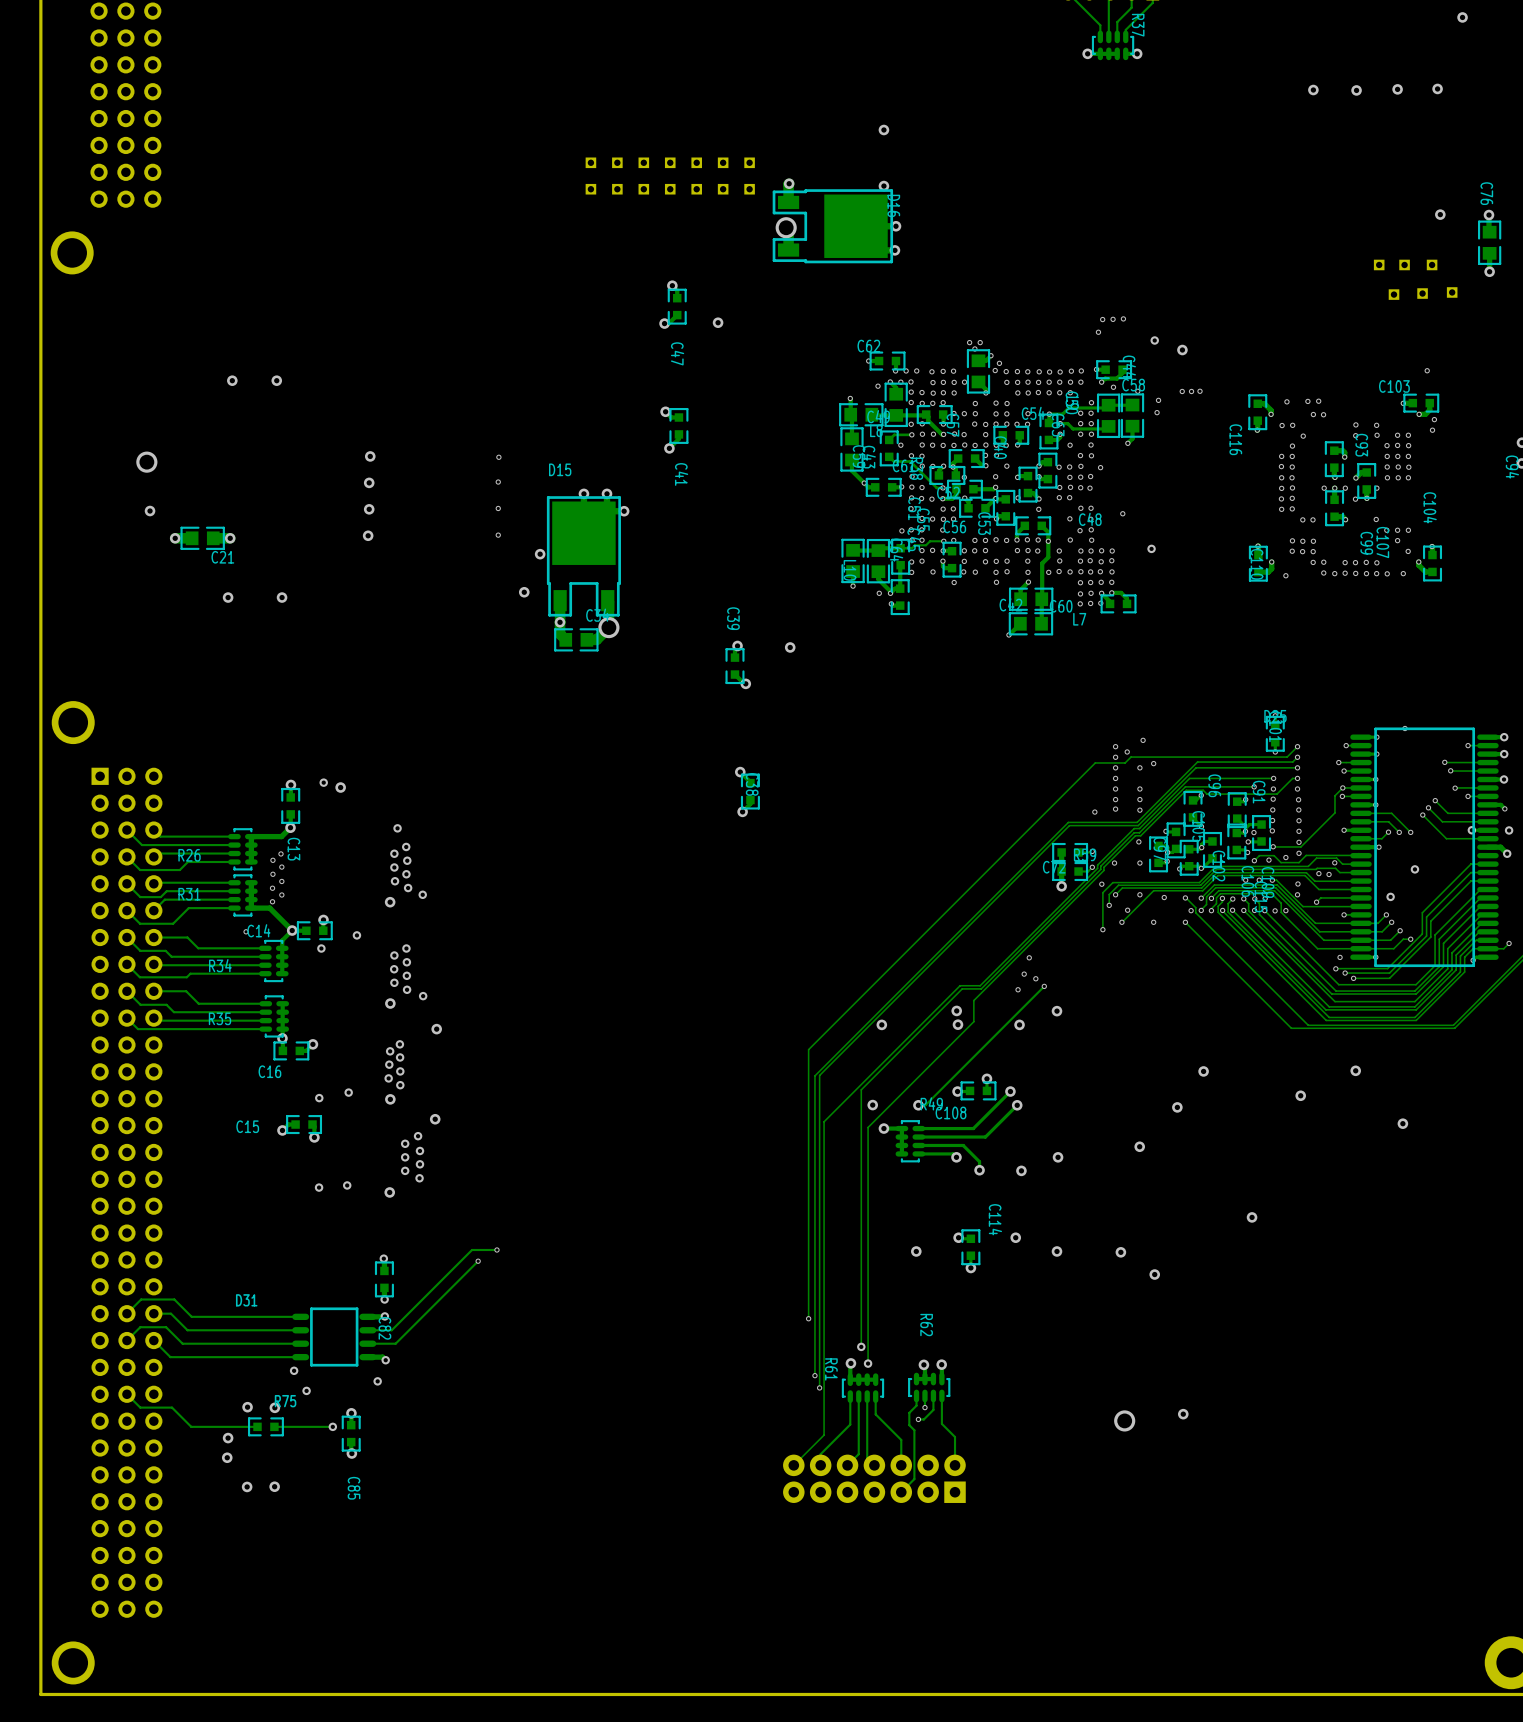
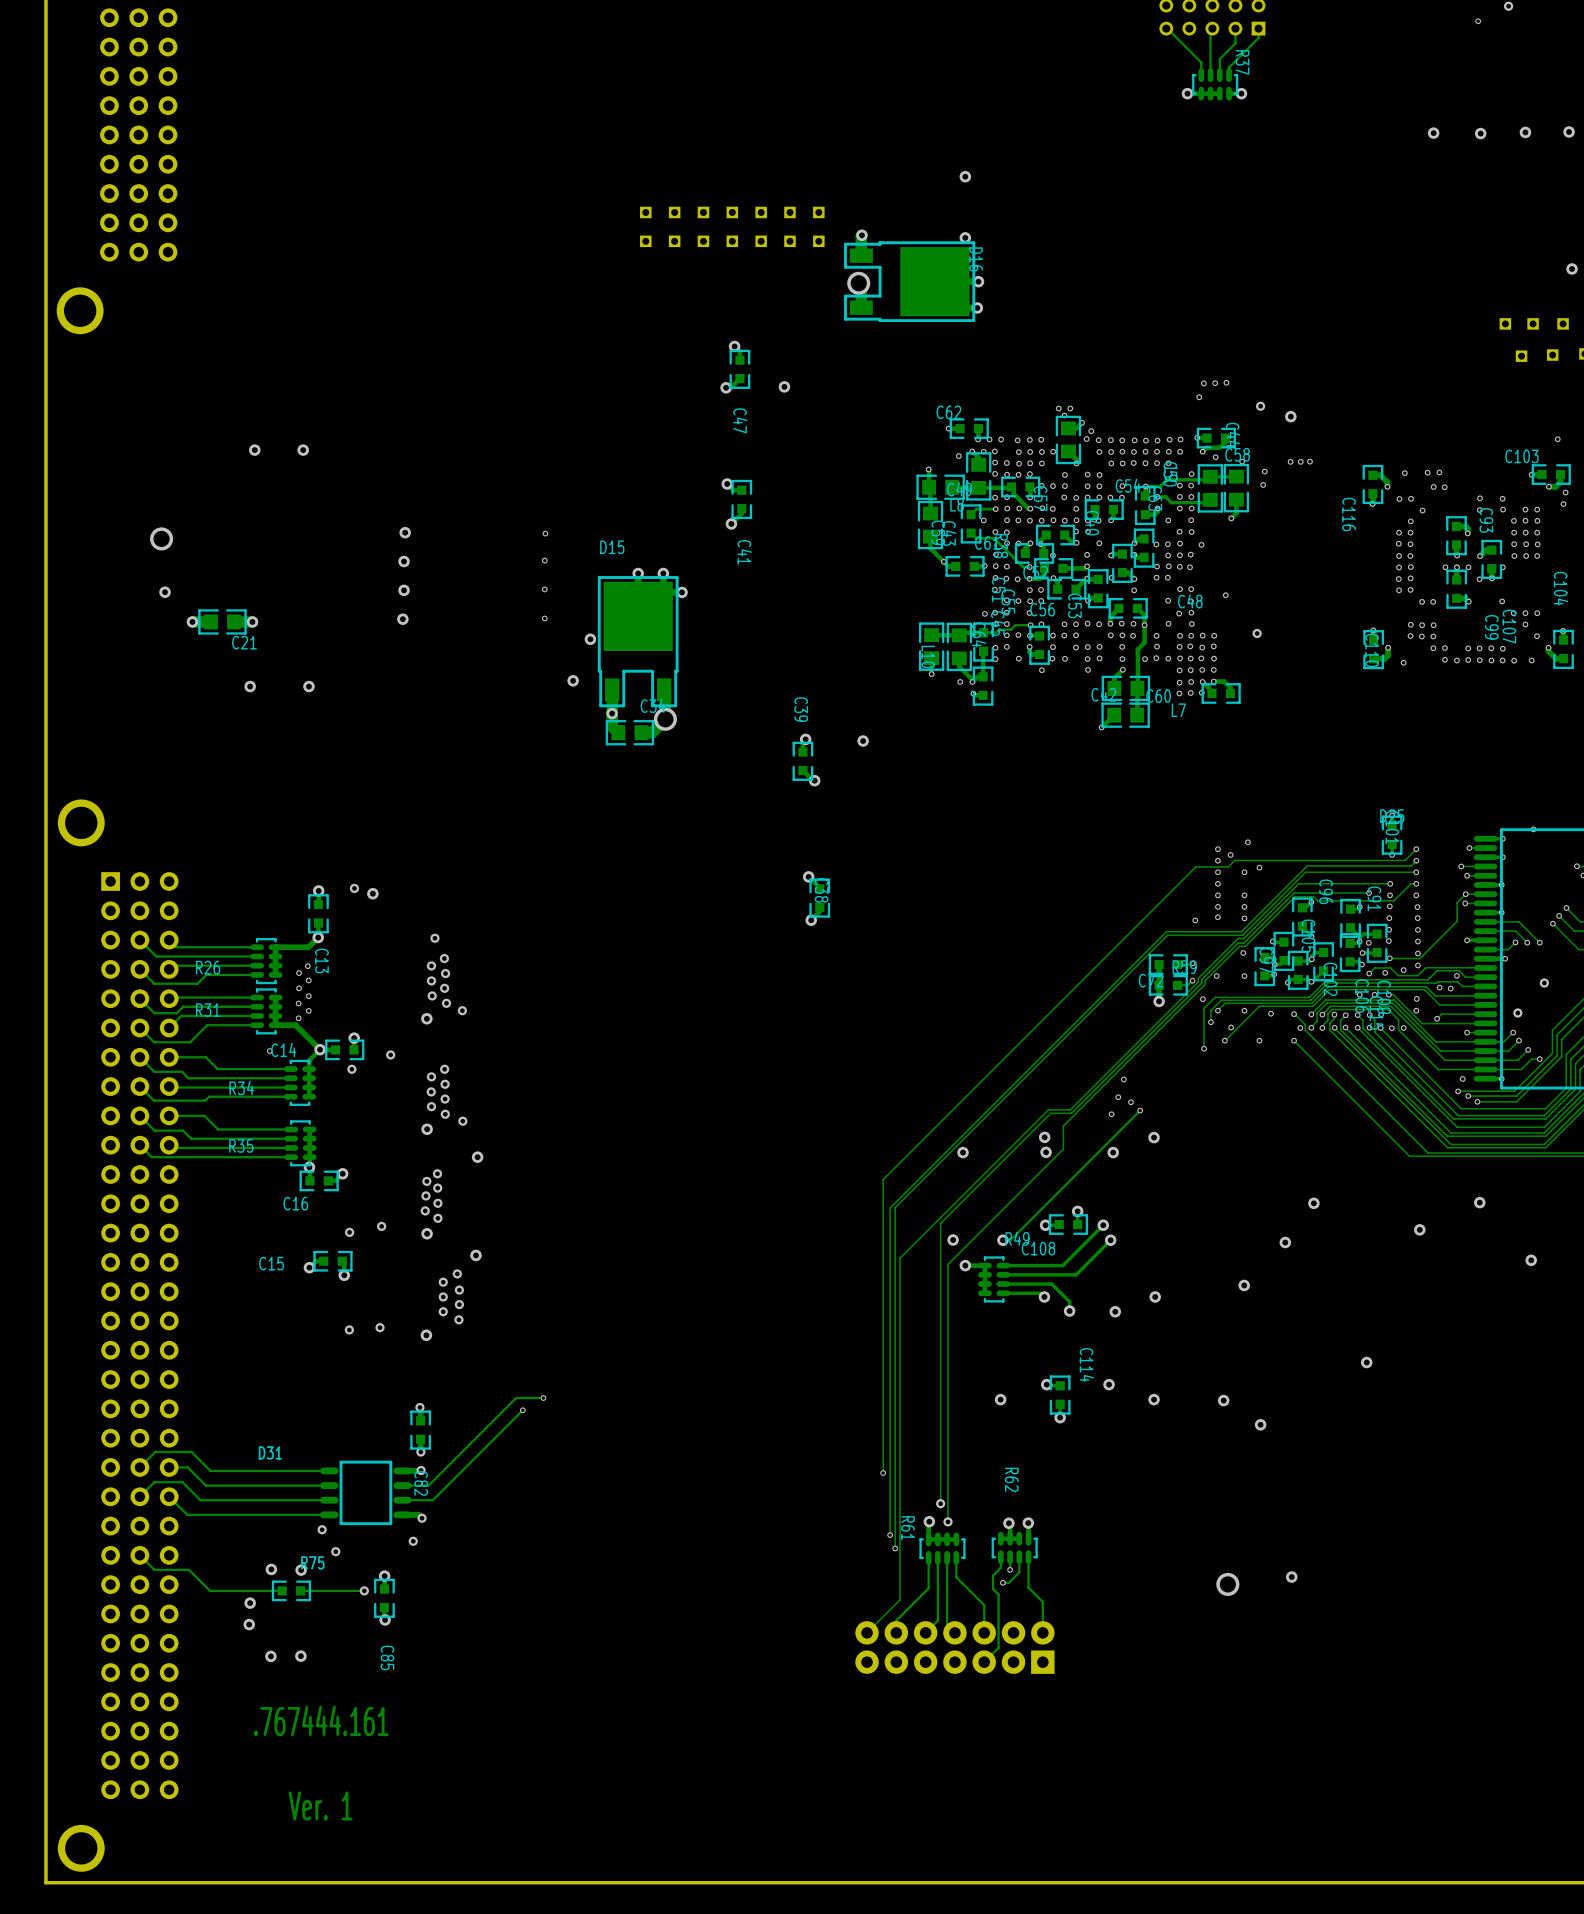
text: none -> .767444.161 (321, 1720)
text: none -> Ver. 1 (320, 1805)

